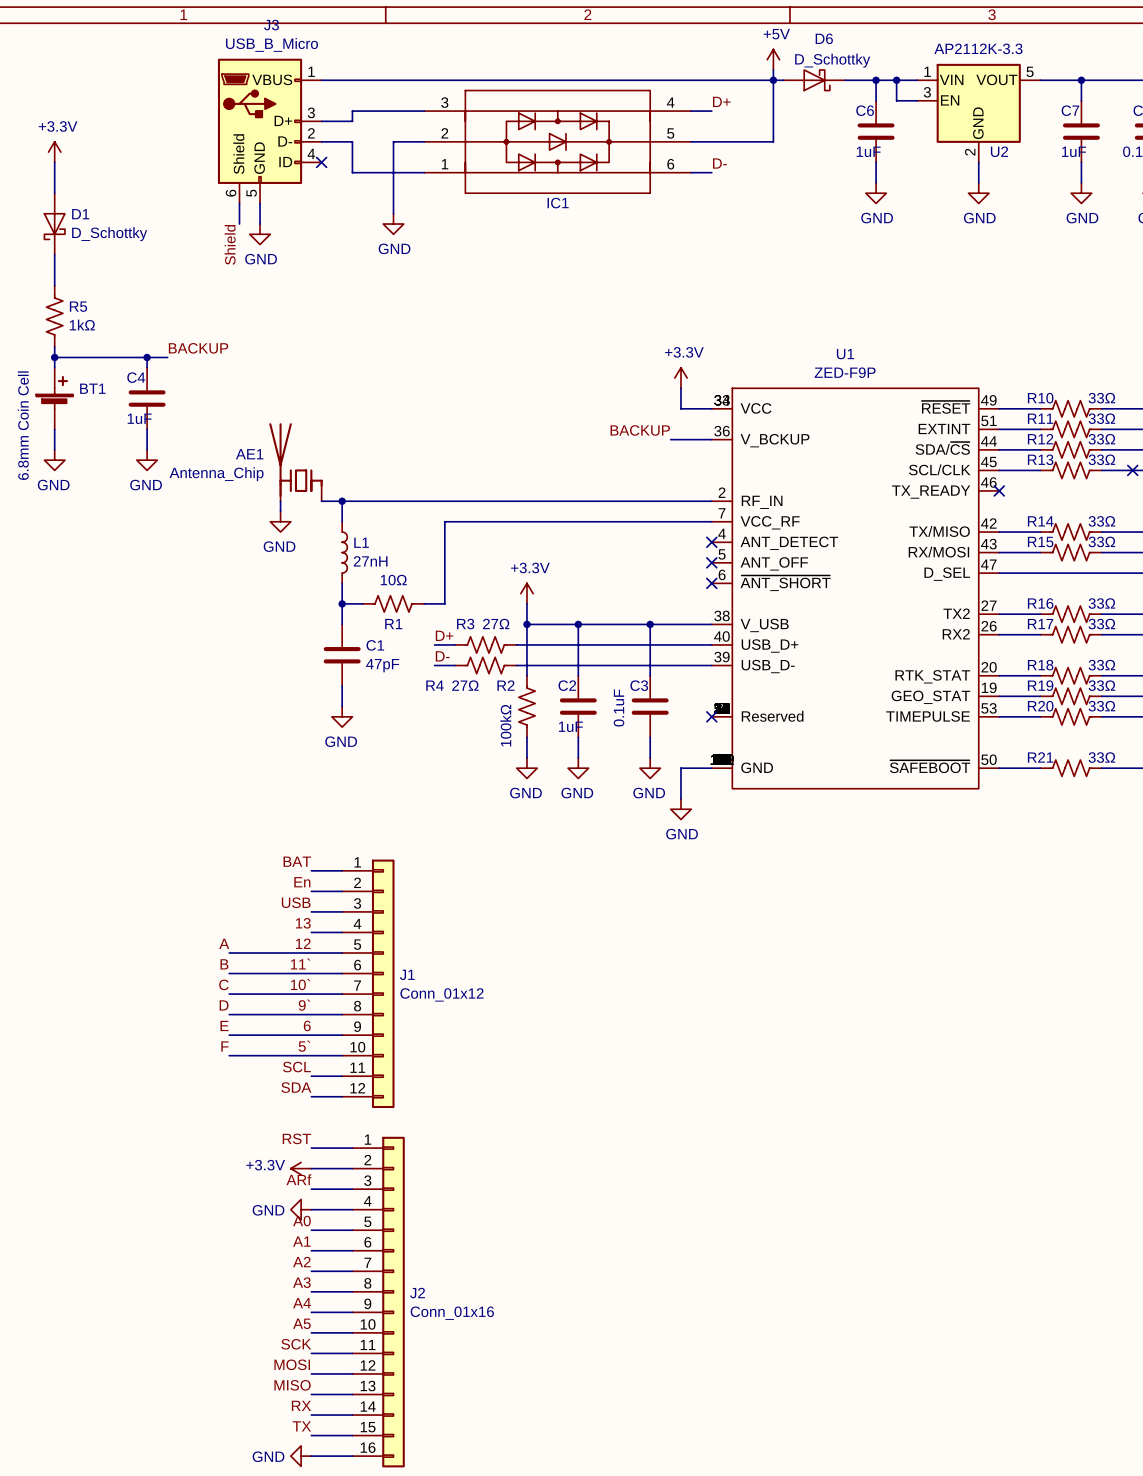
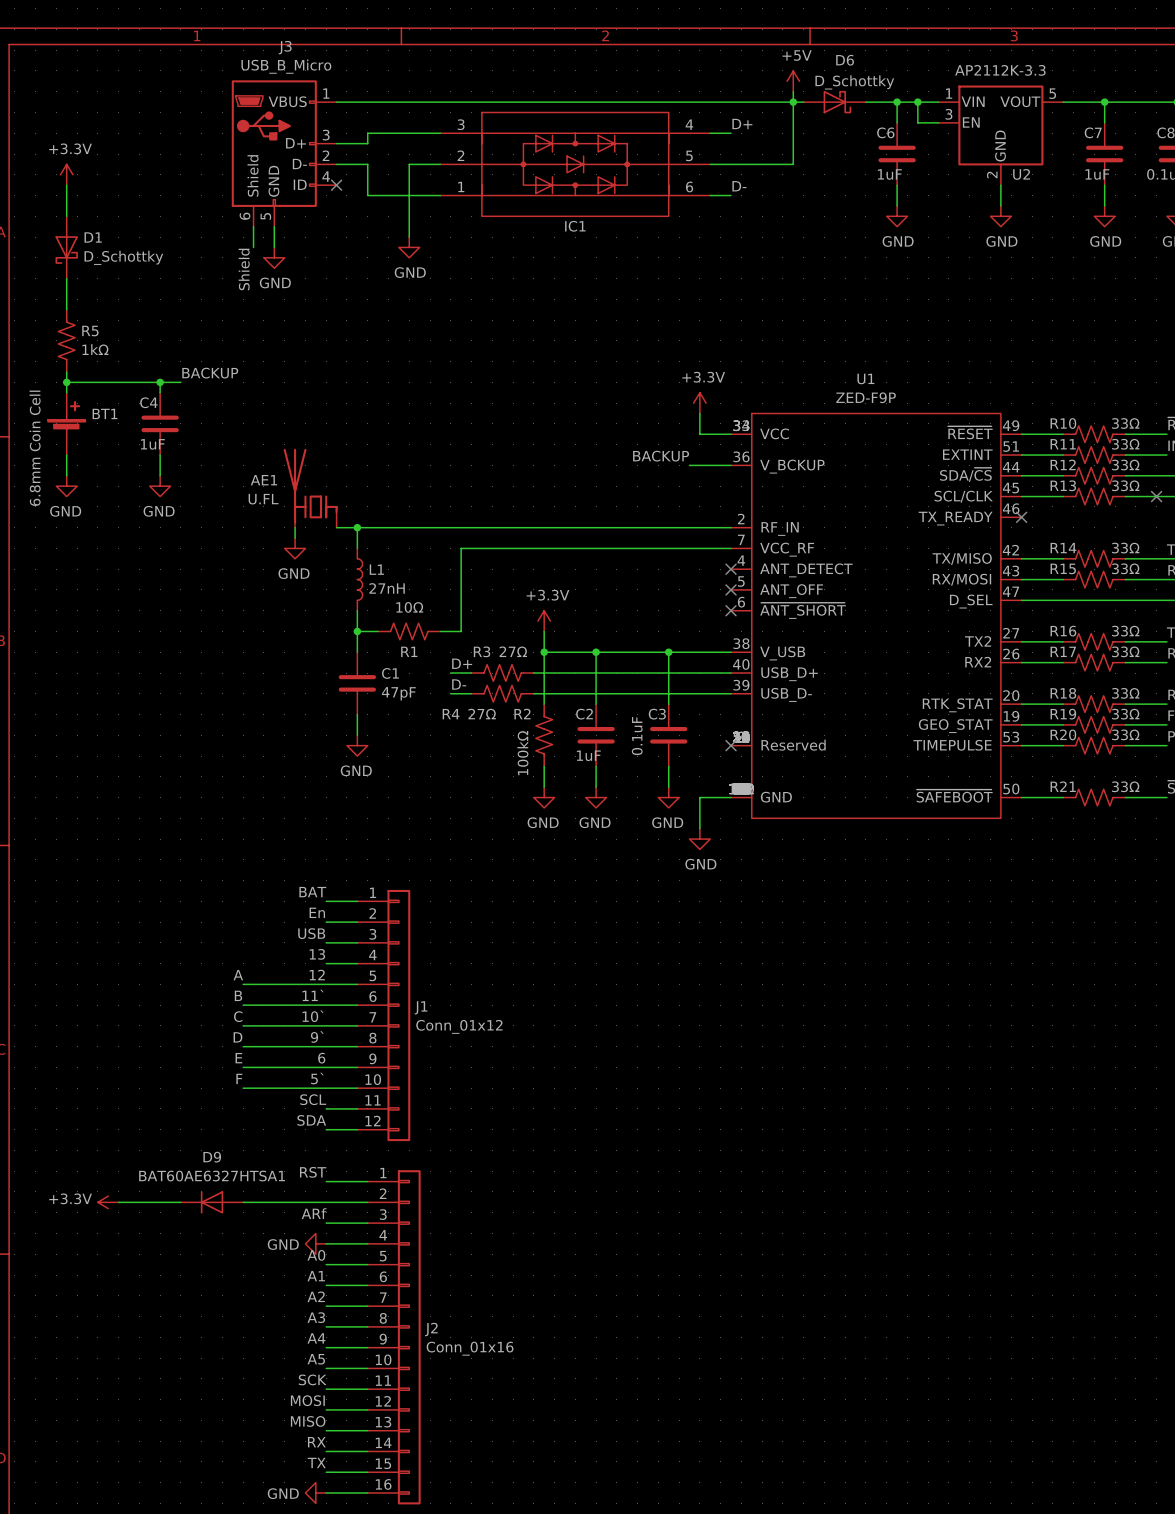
AE1 value: Antenna_Chip (216, 474) -> U.FL (263, 499)
power symbol: none -> +3.3V (108, 1202)
wire: none -> (118, 1202) (180, 1202)
D9: none -> BAT60AE6327HTSA1 (212, 1202)
wire: none -> (243, 1202) (326, 1202)
power symbol: +3.3V (301, 1168) -> none

